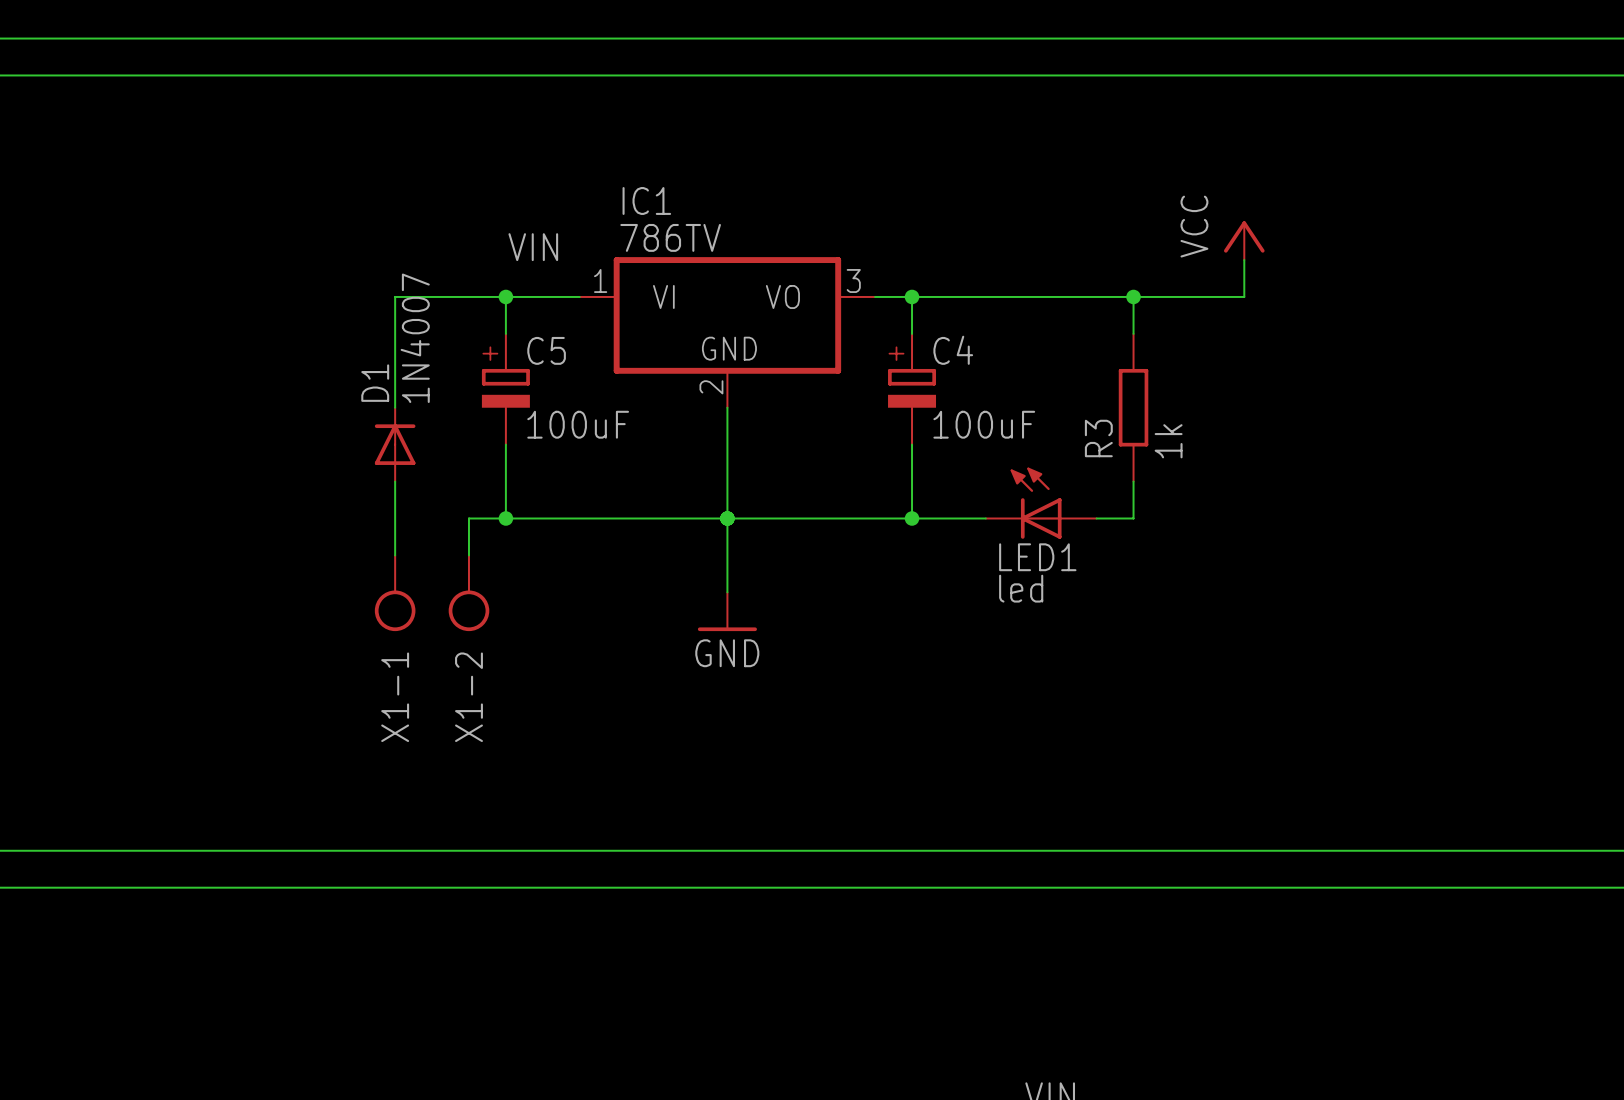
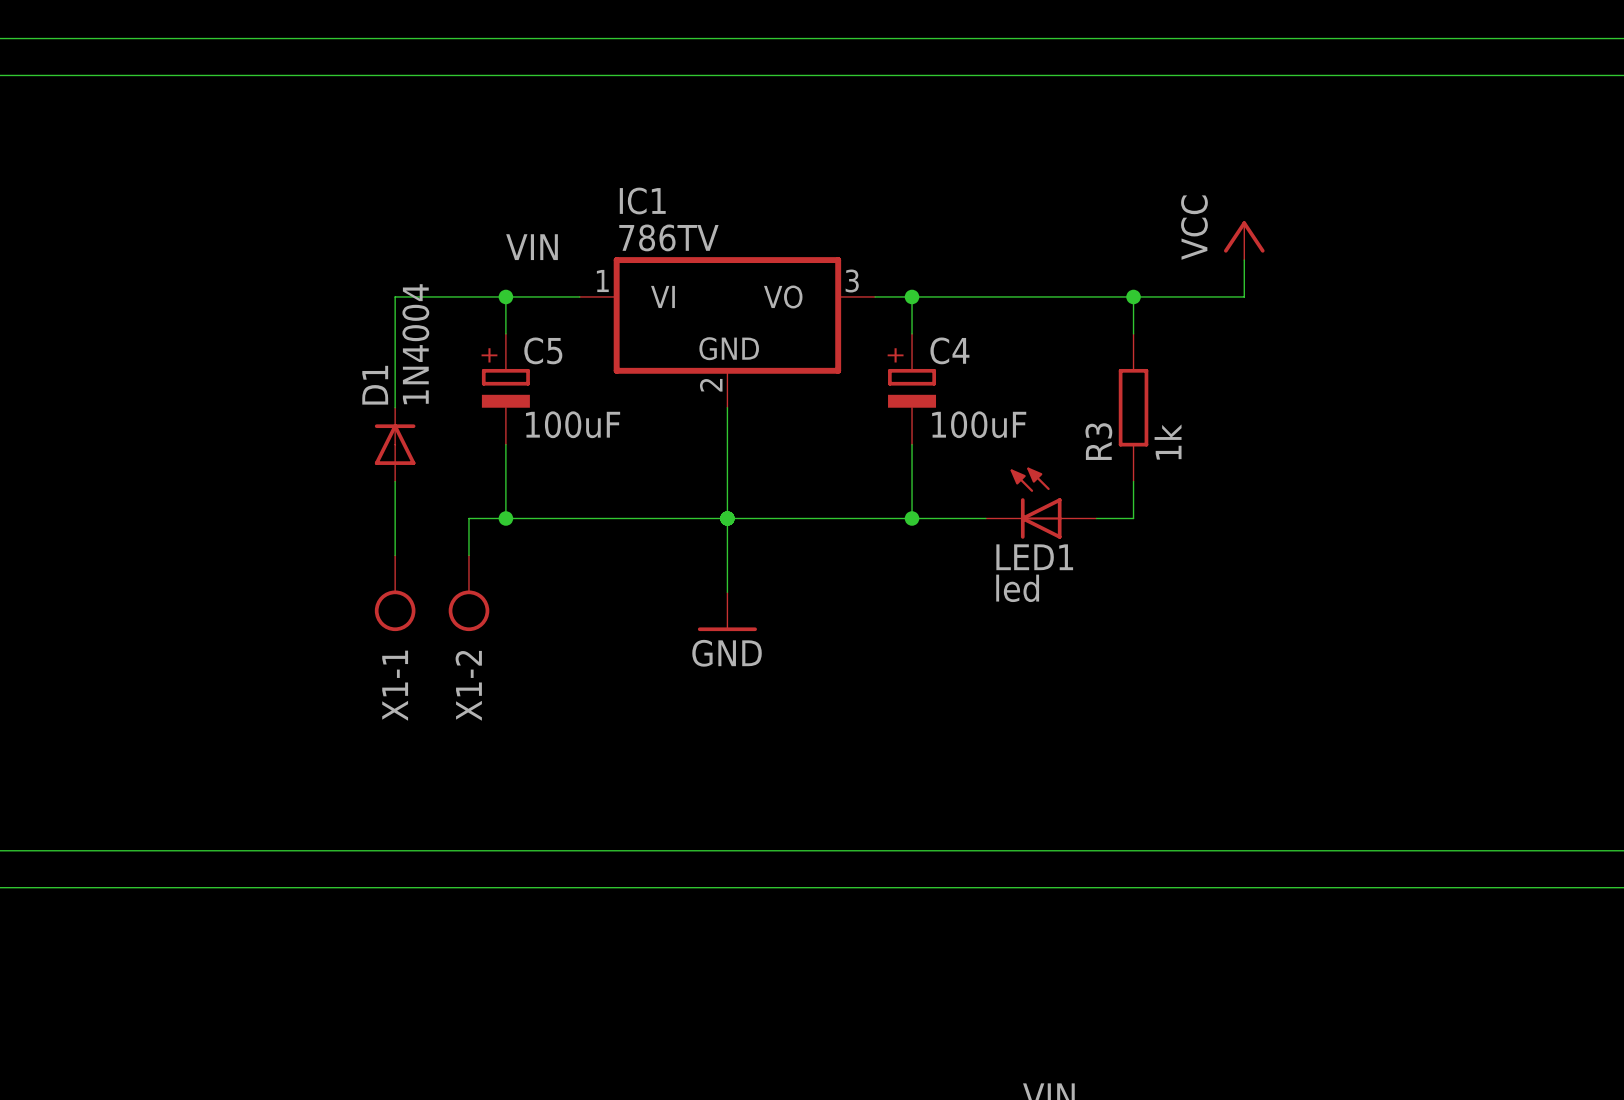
D1 value: 1N4007 (415, 338) -> 1N4004 (415, 344)

